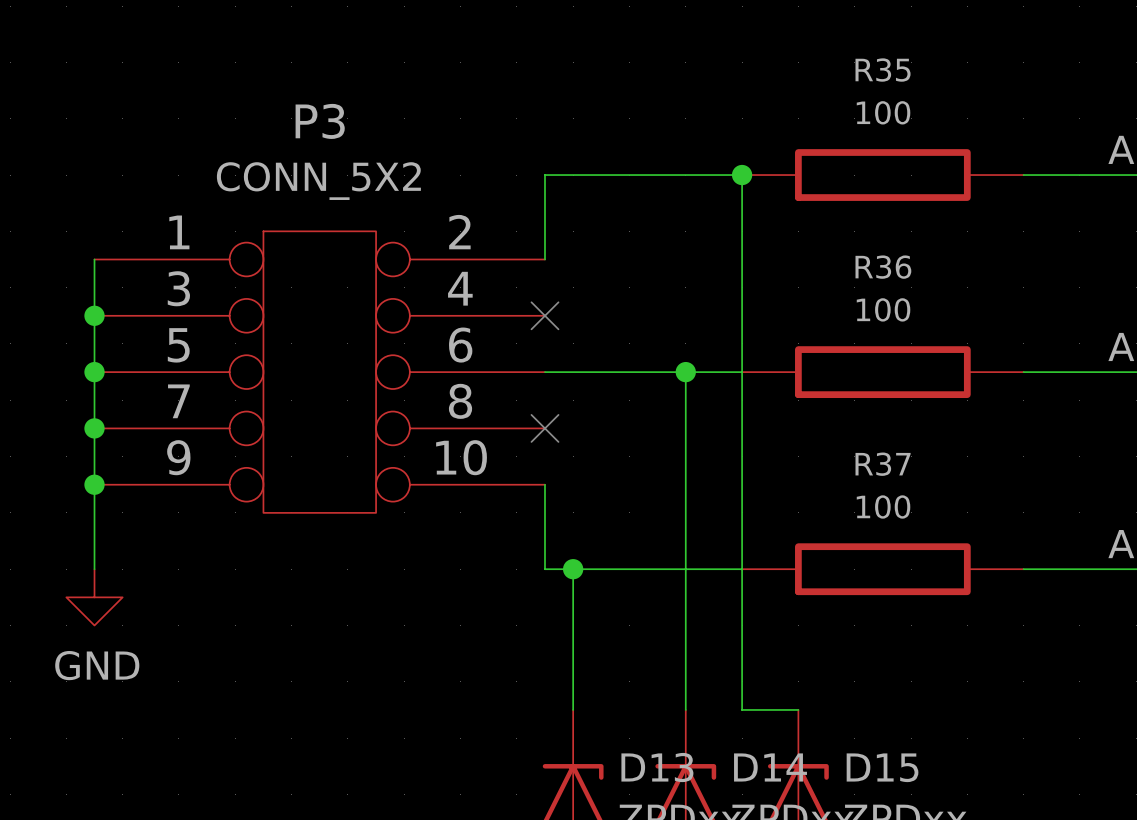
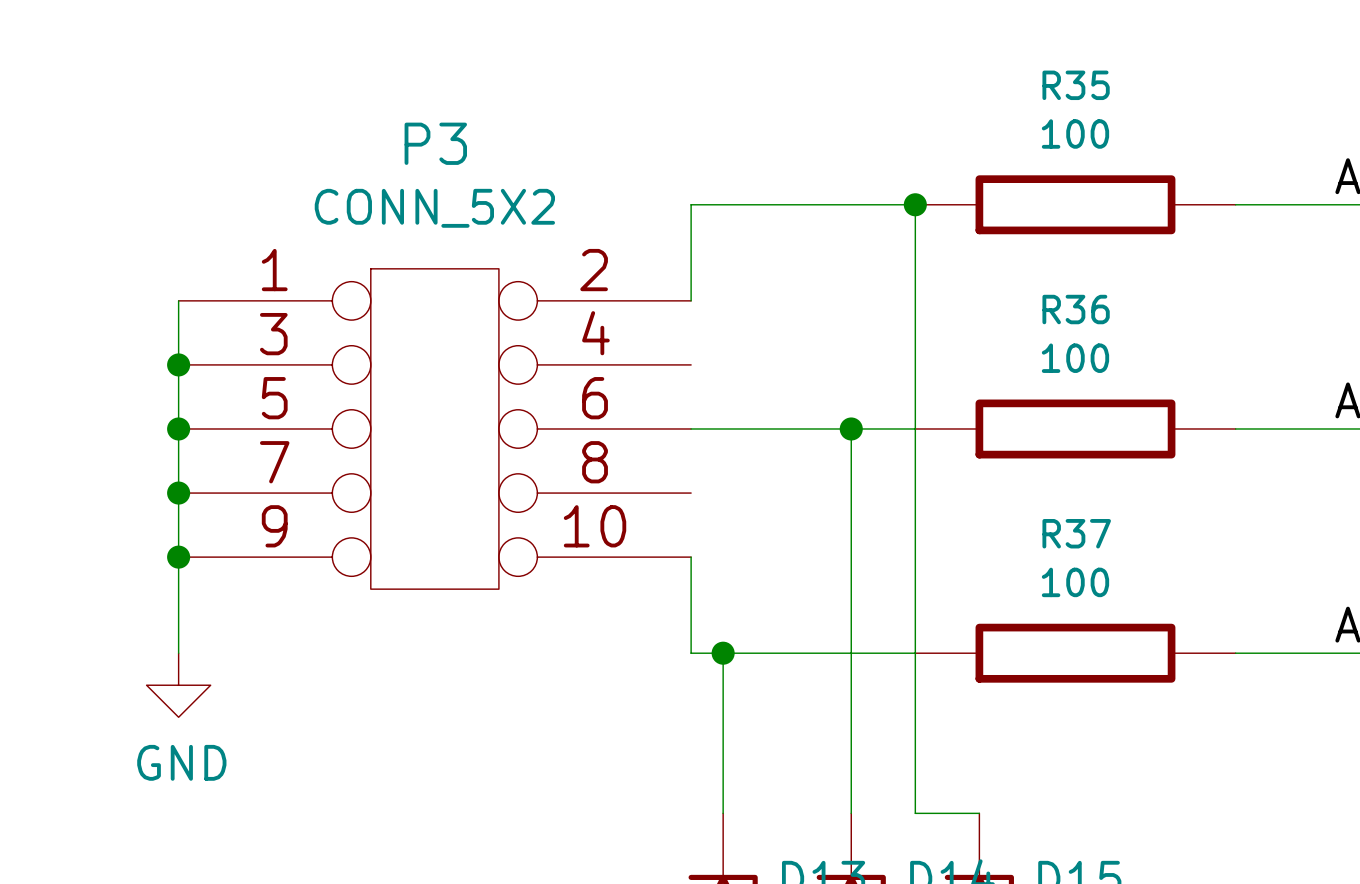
no-connect mark: (544, 315) -> none
no-connect mark: (544, 428) -> none

